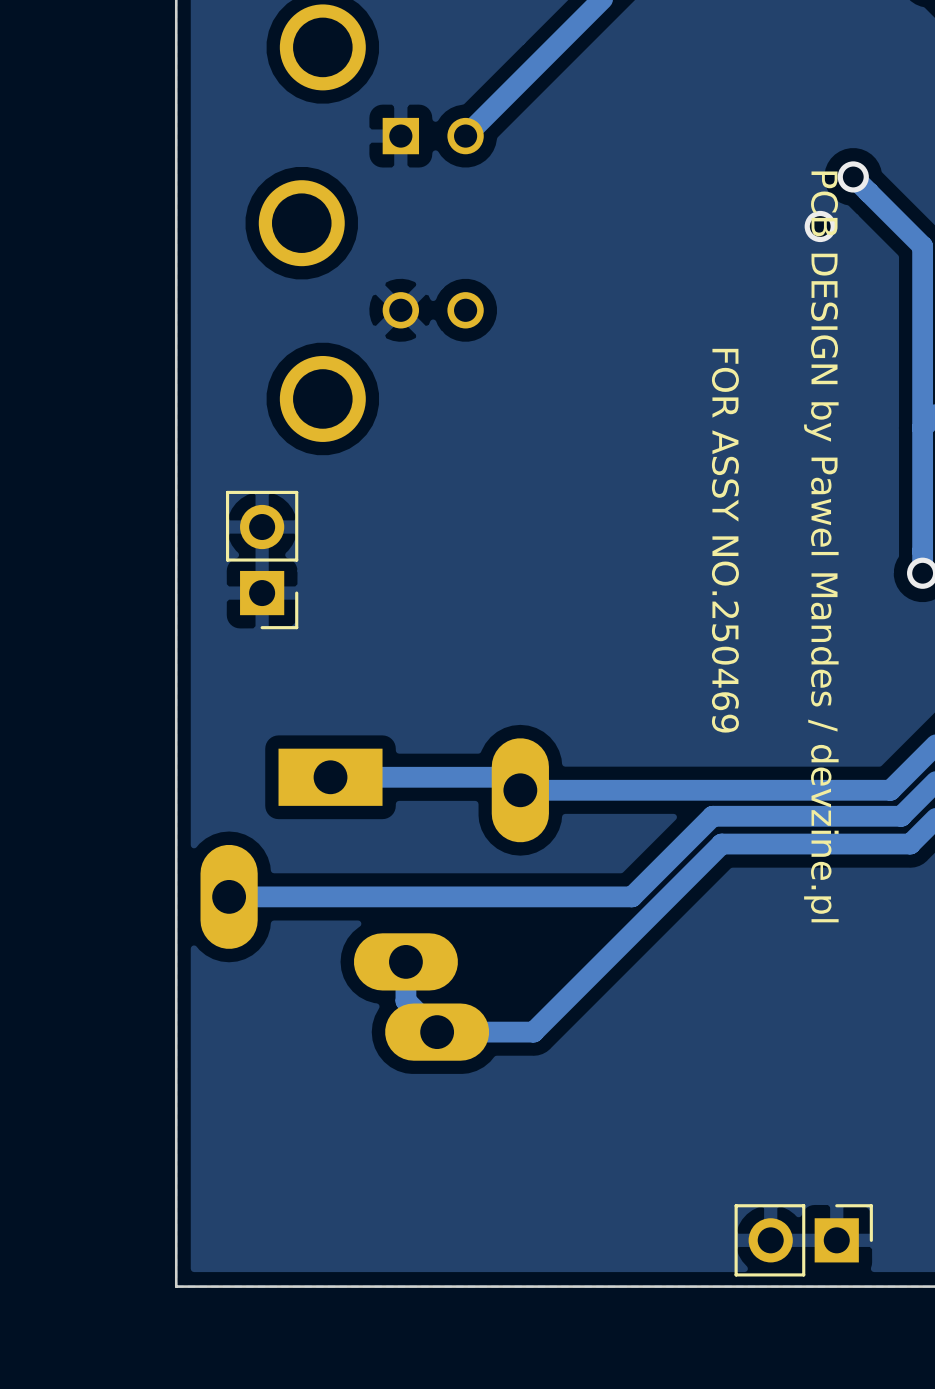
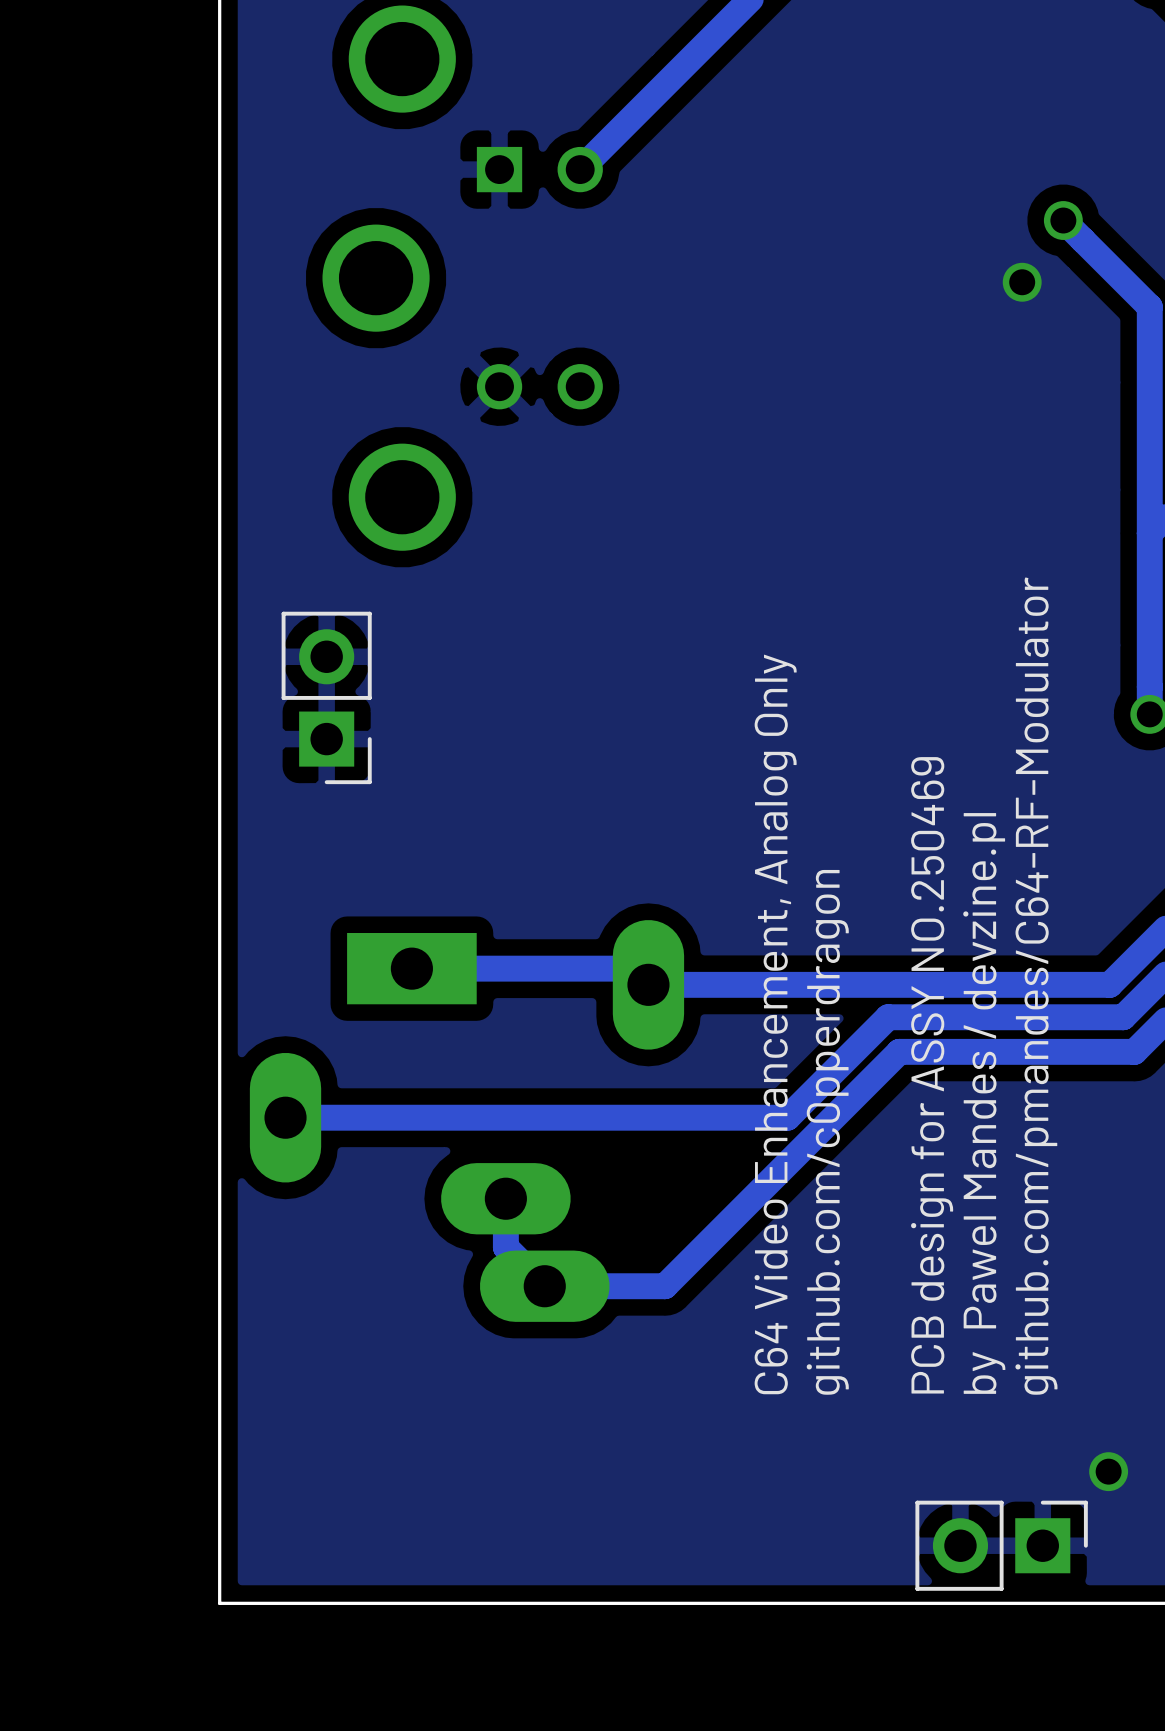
text: FOR ASSY NO.250469 (725, 540) -> PCB design for ASSY NO.250469 (932, 1075)
text: PCB DESIGN by Pawel Mandes / devzine.pl (821, 546) -> by Pawel Mandes / devzine.pl (984, 1103)
text: none -> github.com/pmandes/C64-RF-Modulator (1036, 986)
text: none -> C64 Video Enhancement, Analog Only (775, 1024)
text: none -> github.com/c0pperdragon (827, 1132)
via: none -> (1108, 1471)

